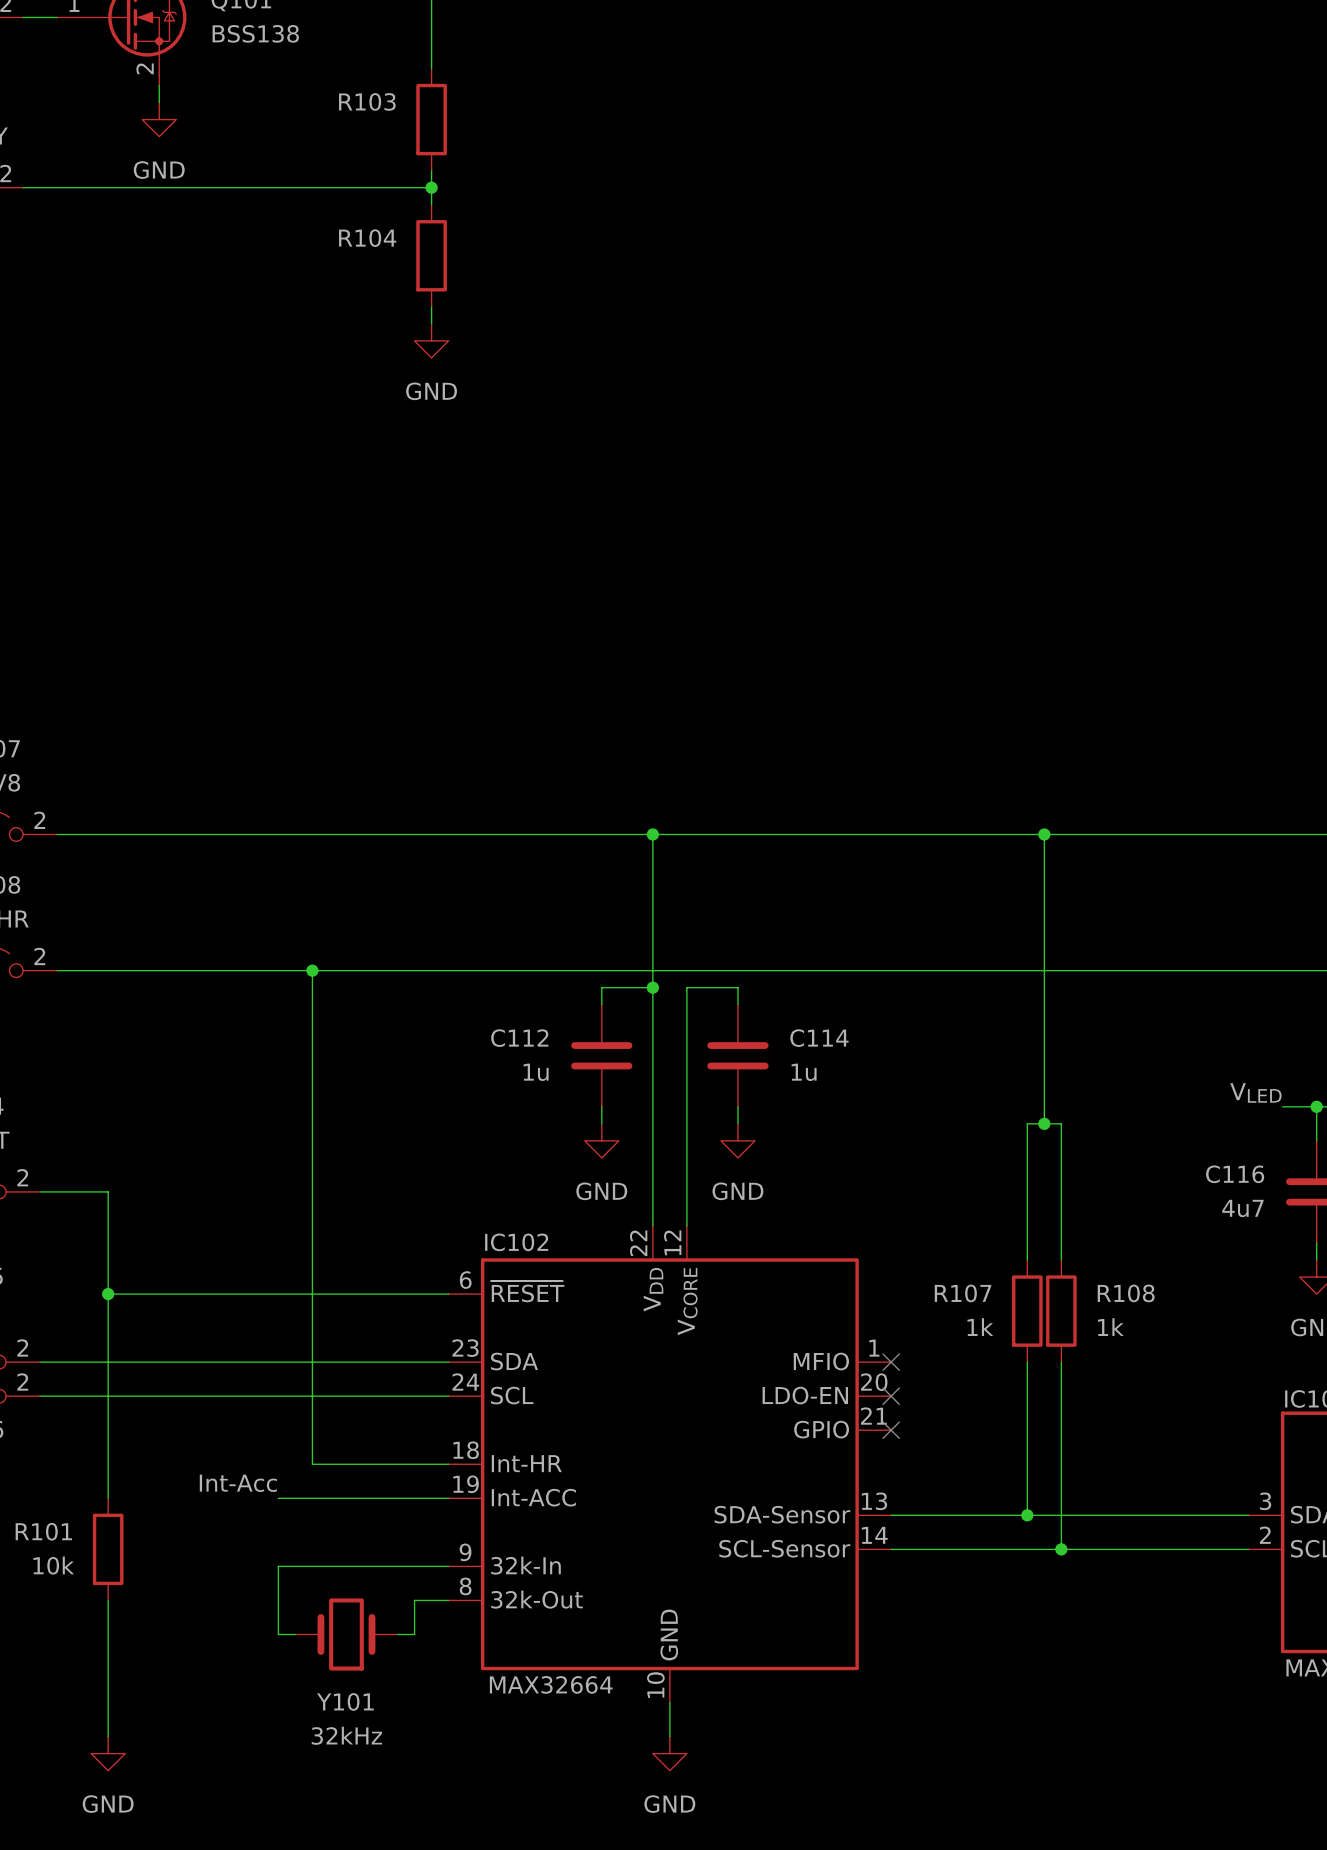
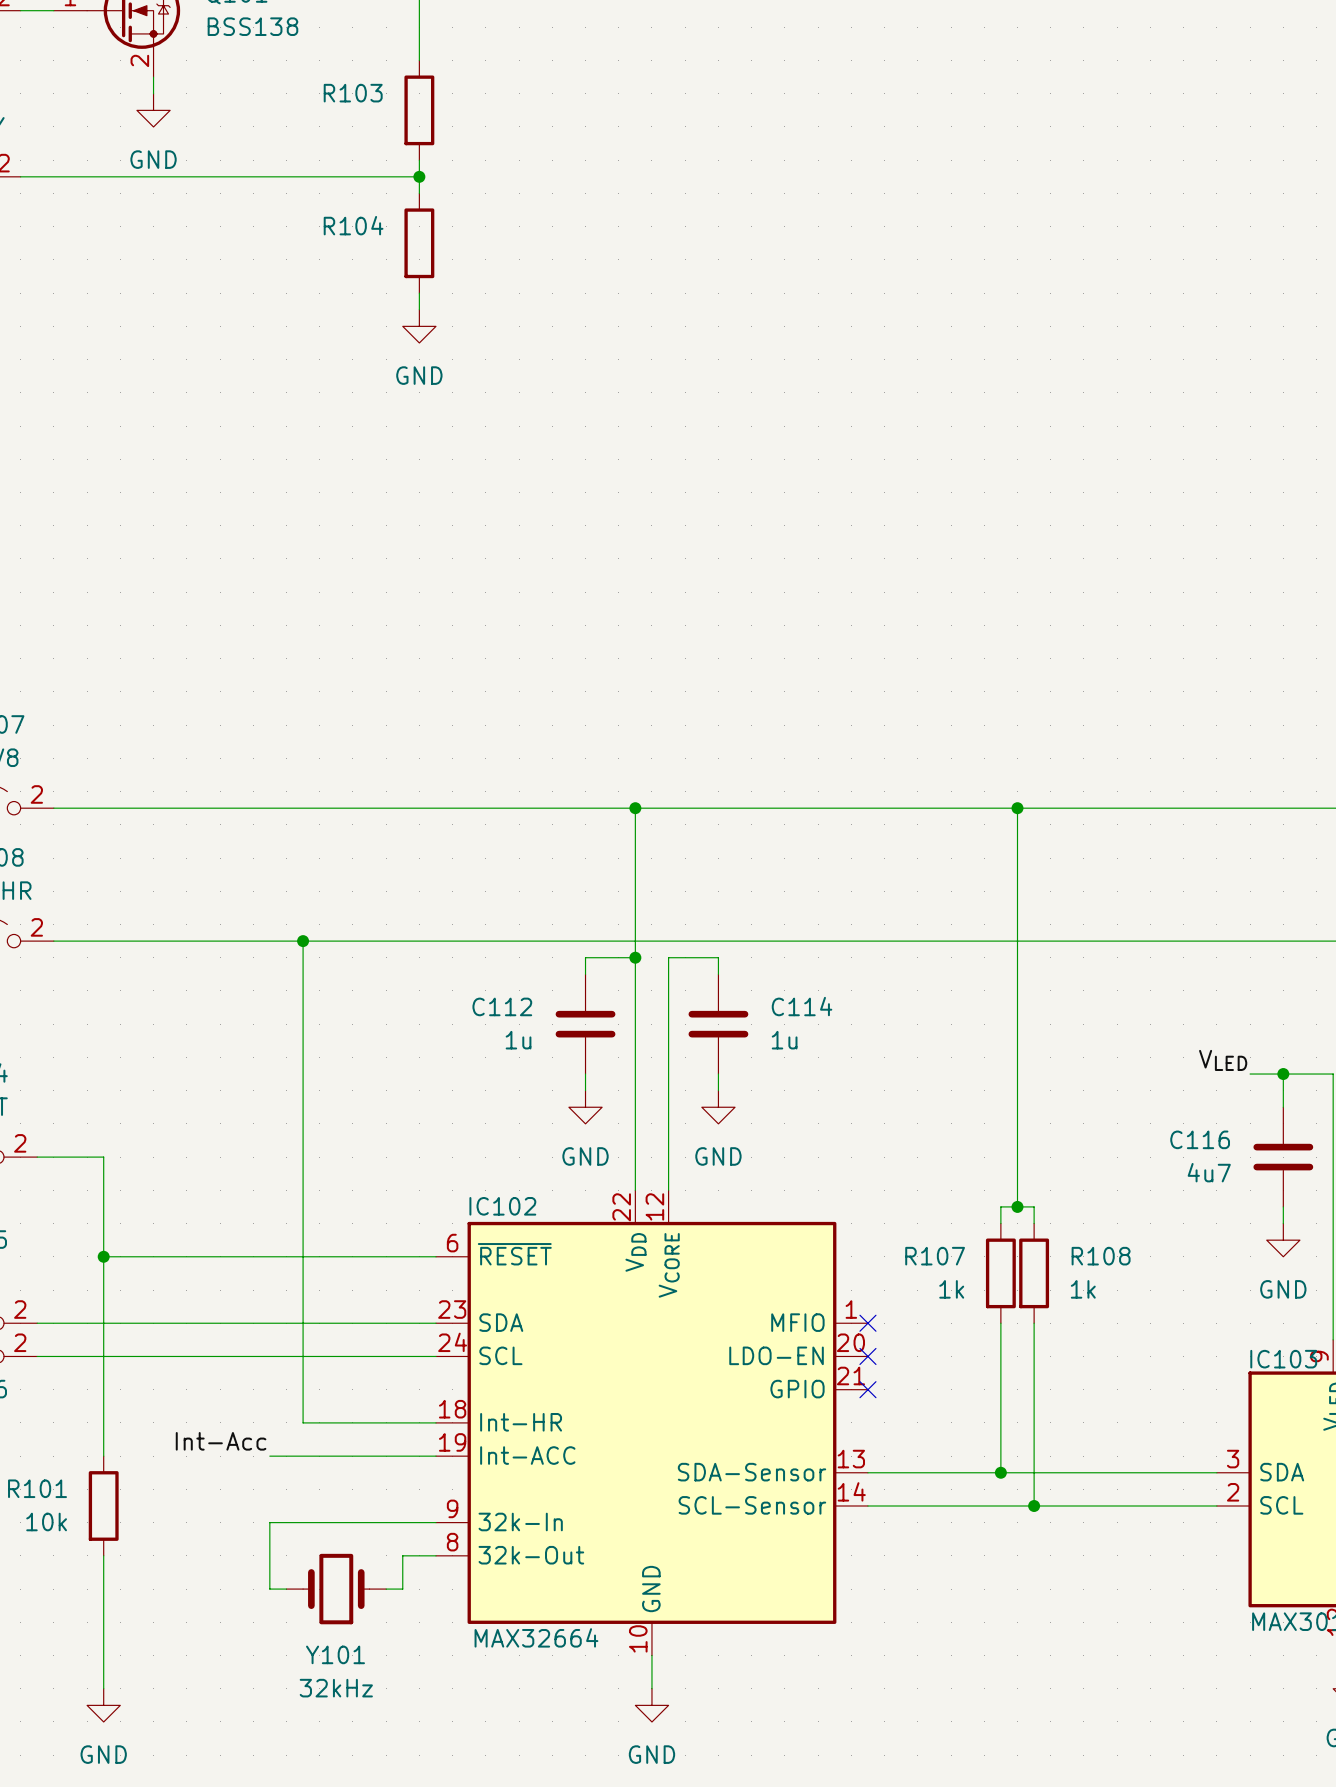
wire: none -> (1017, 1090) (1017, 1206)
junction: (1044, 1123) -> none
wire: (1027, 1243) (1027, 1123) (1061, 1123) (1061, 1243) -> (1000, 1206) (1034, 1206)
junction: none -> (1017, 1206)

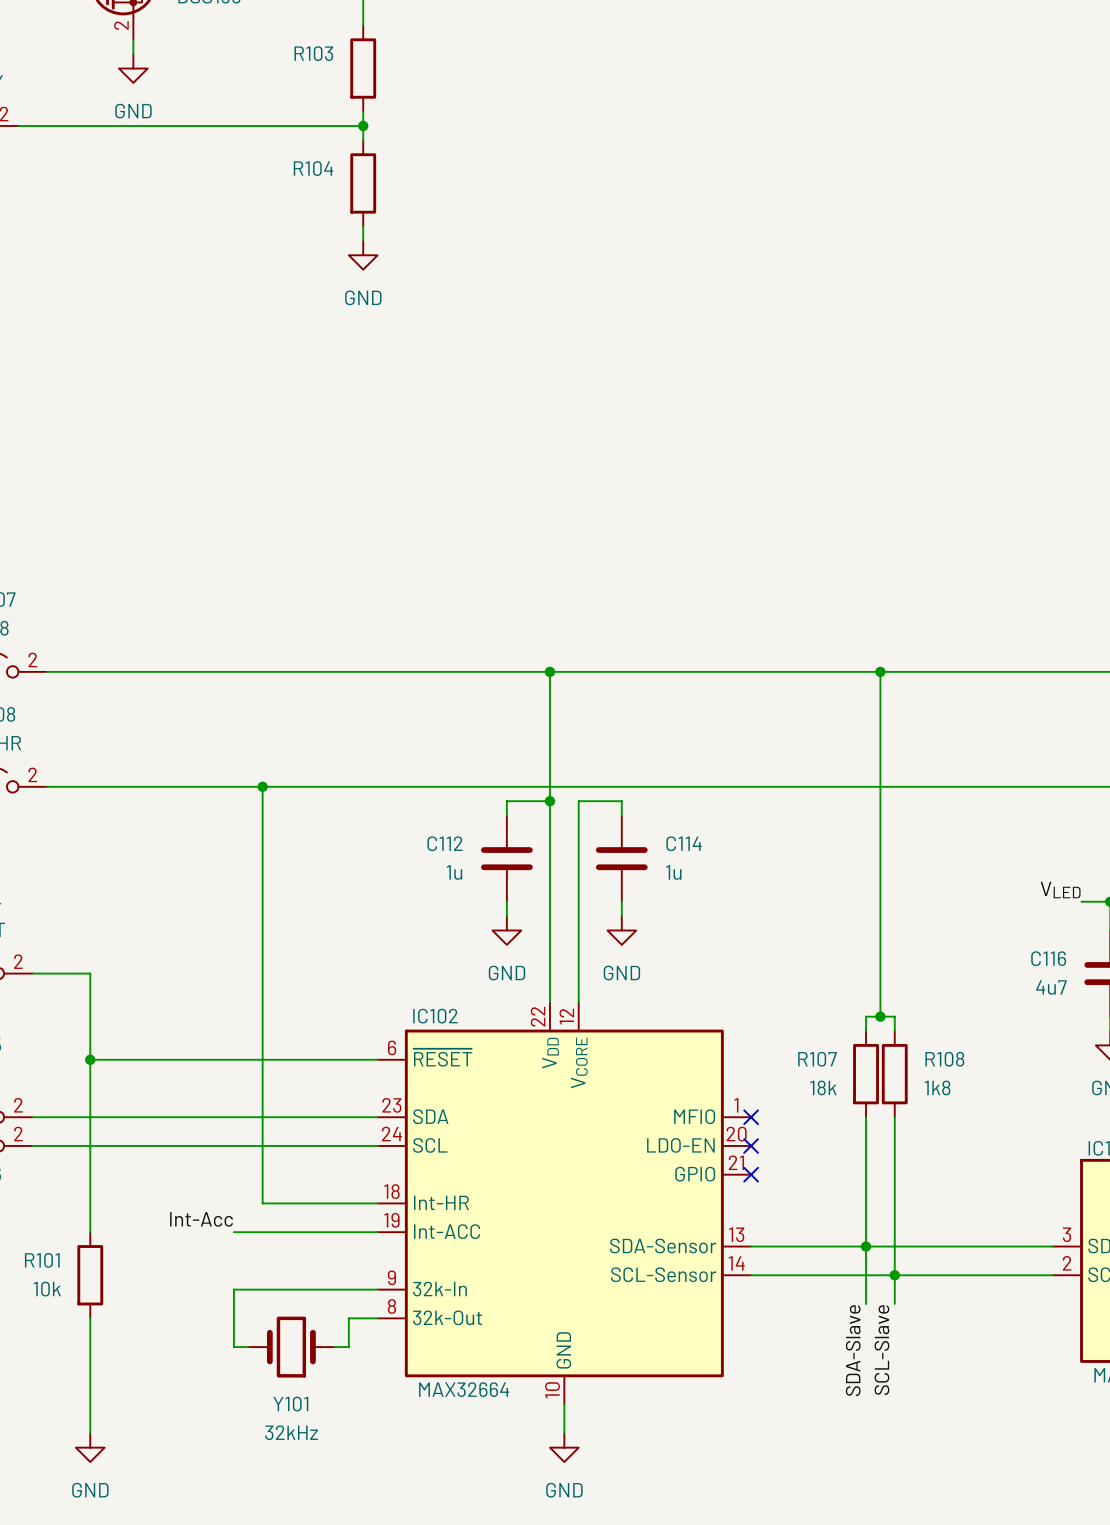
R107 value: 1k (951, 1289) -> 18k (823, 1087)
R108 value: 1k (1083, 1289) -> 1k8 (937, 1087)
wire: none -> (866, 1246) (866, 1303)
wire: none -> (894, 1275) (894, 1303)
label: none -> SCL-Slave (881, 1350)
label: none -> SDA-Slave (853, 1350)

